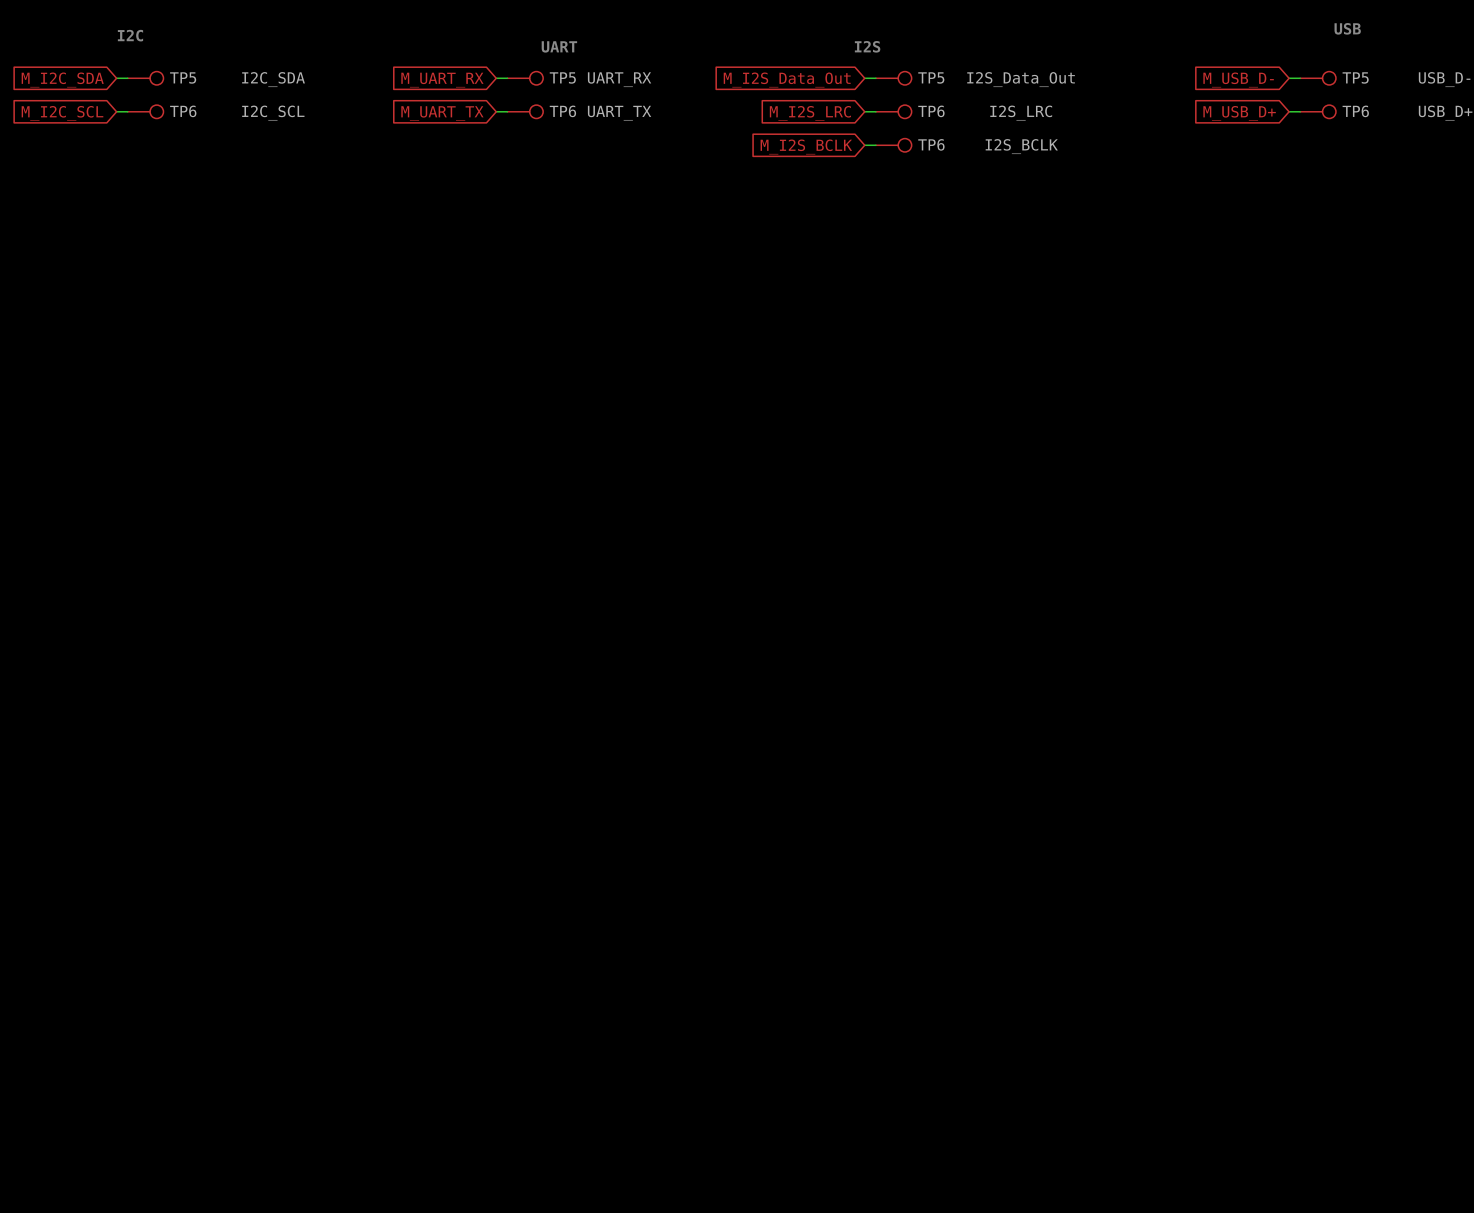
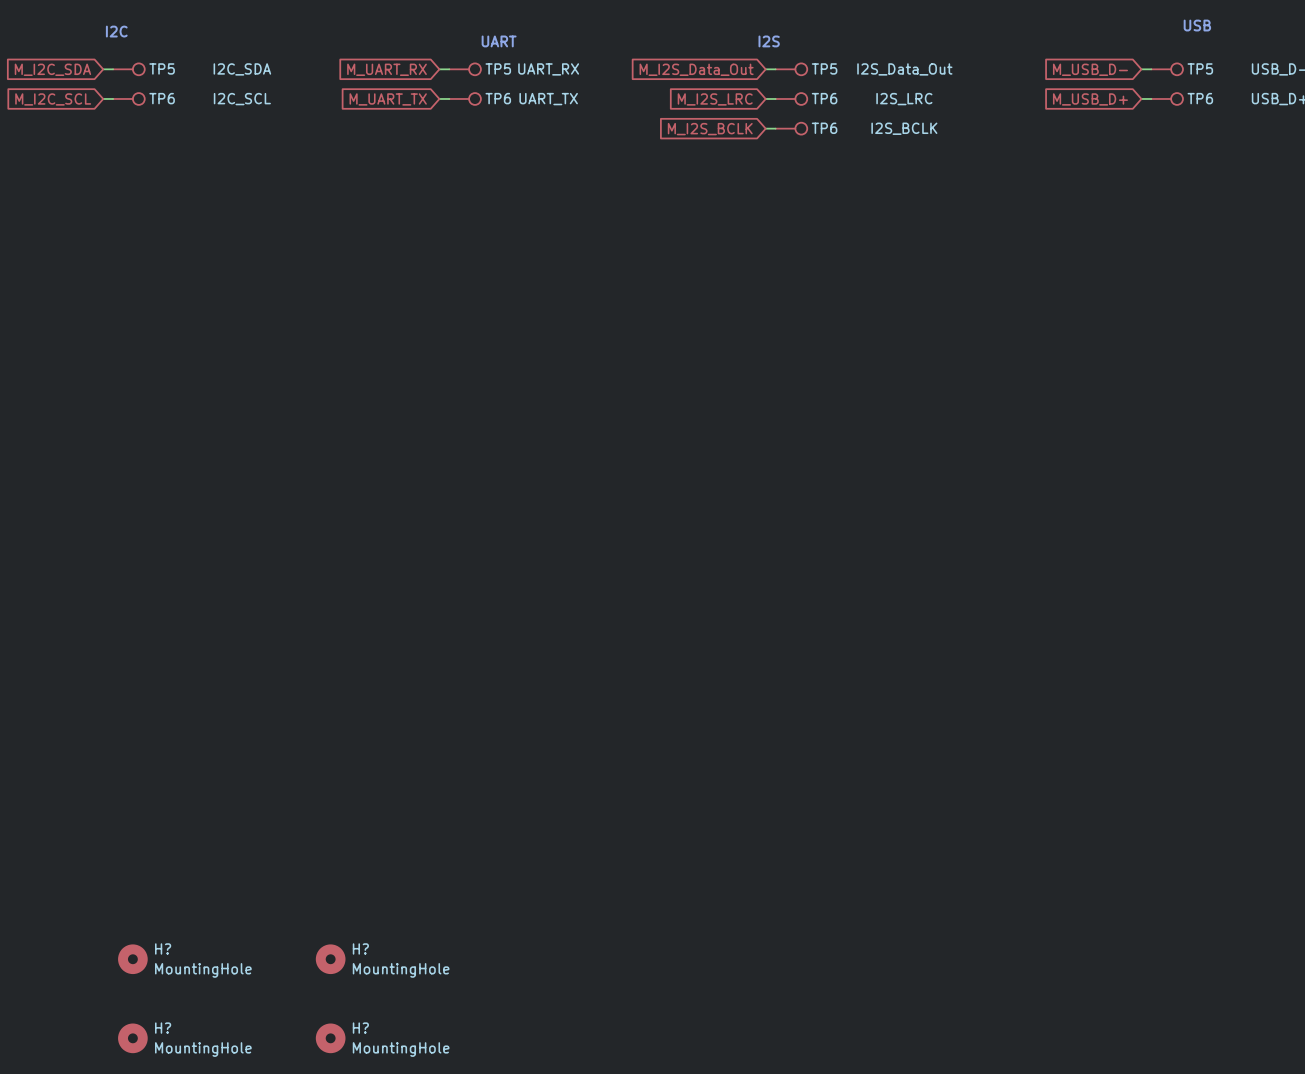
H?: none -> MountingHole (132, 959)
H?: none -> MountingHole (330, 959)
H?: none -> MountingHole (132, 1038)
H?: none -> MountingHole (330, 1038)

